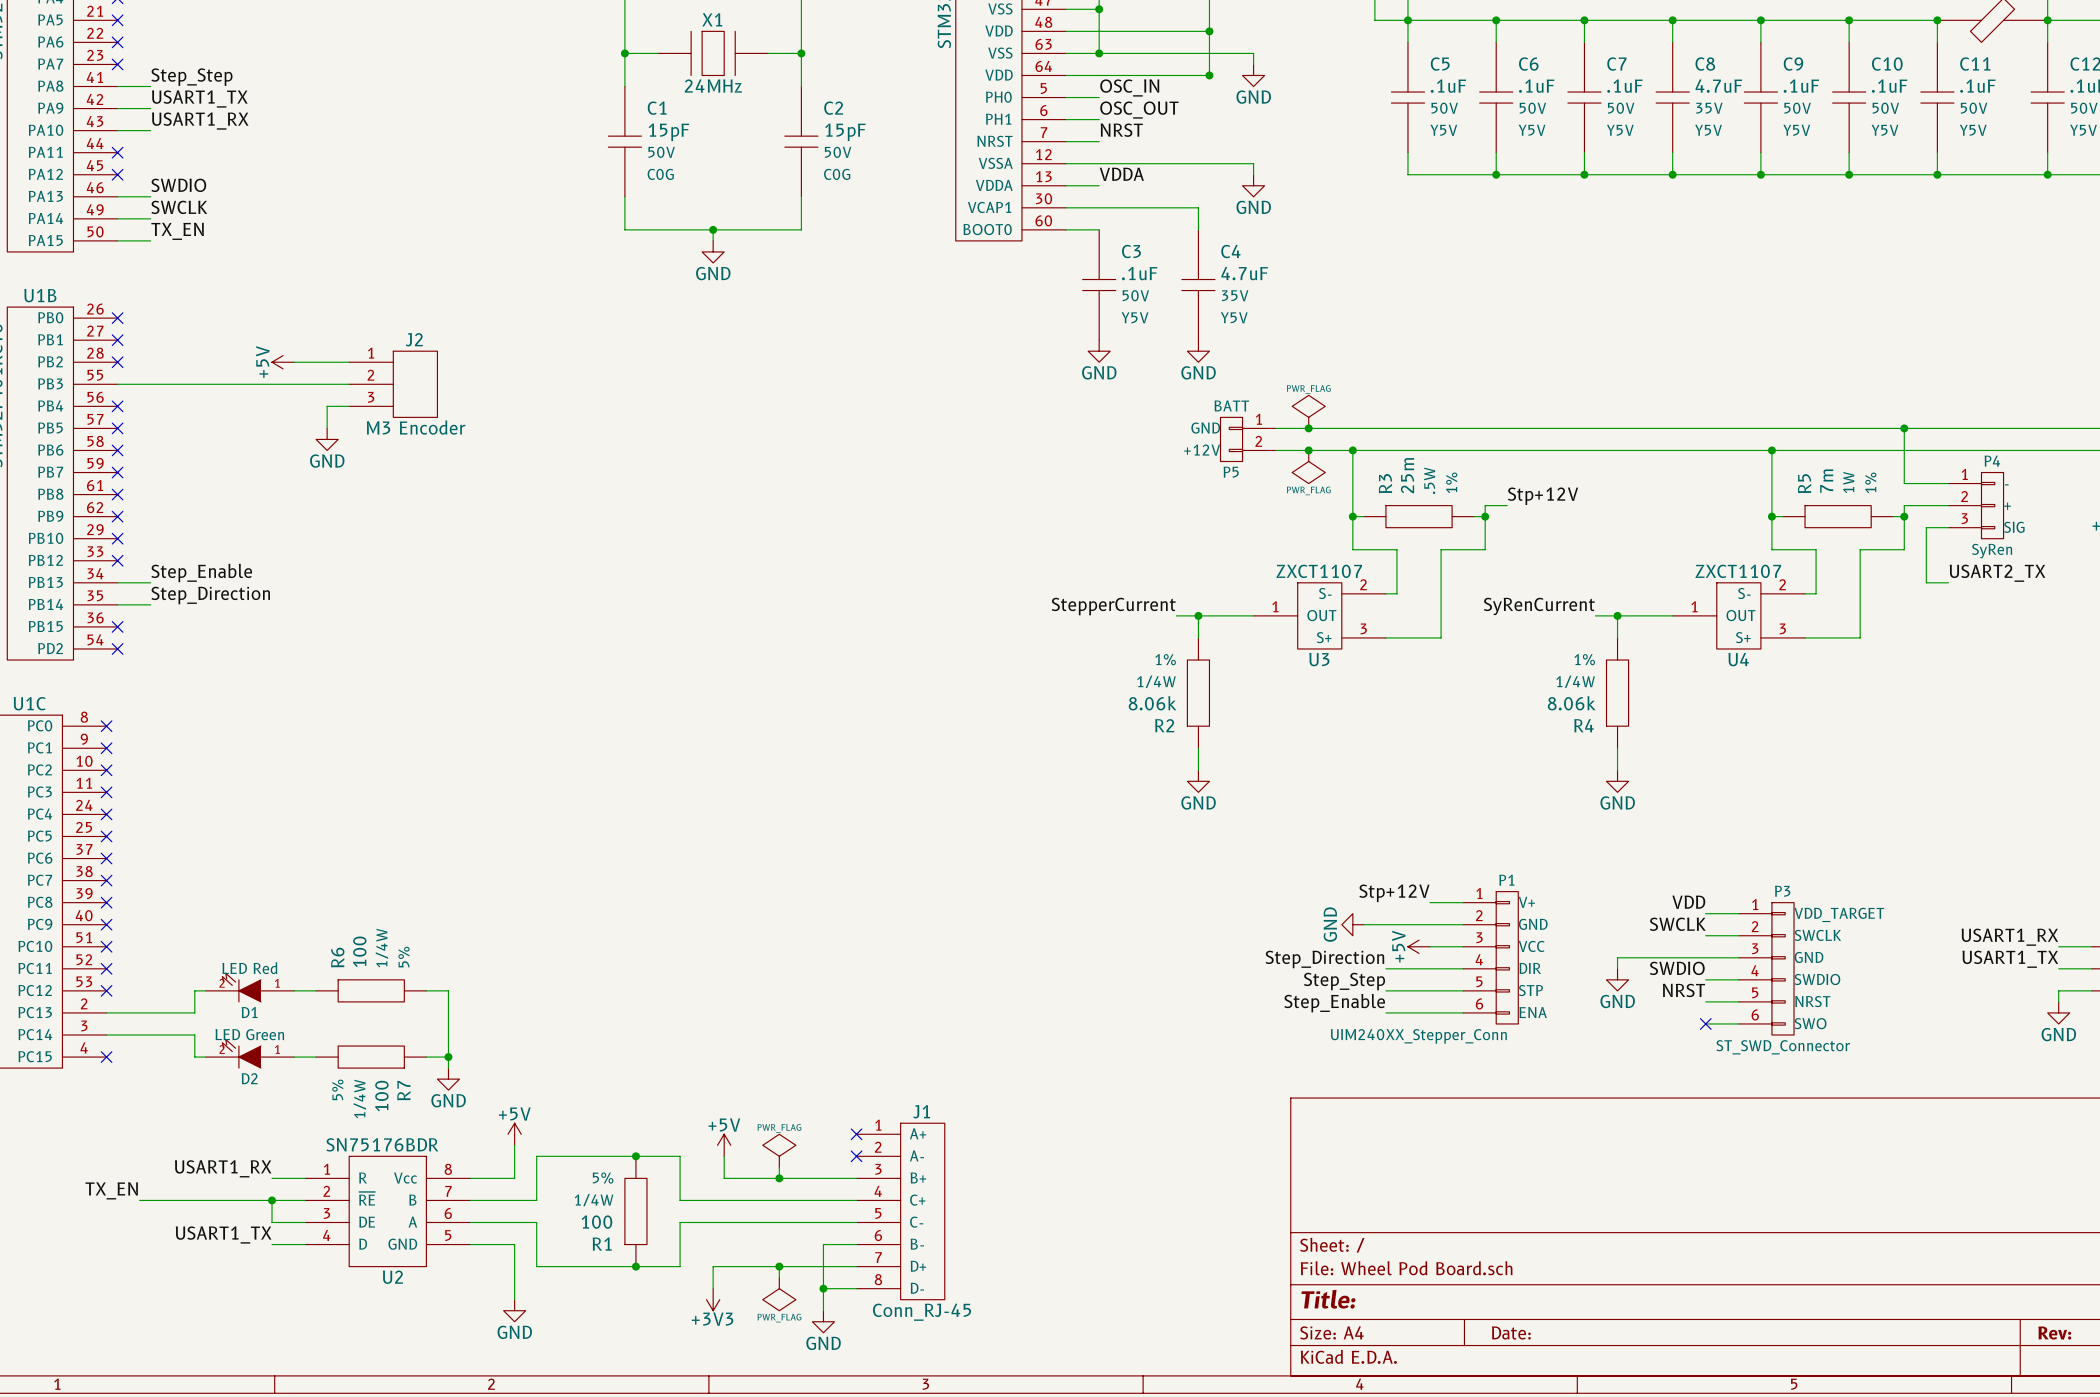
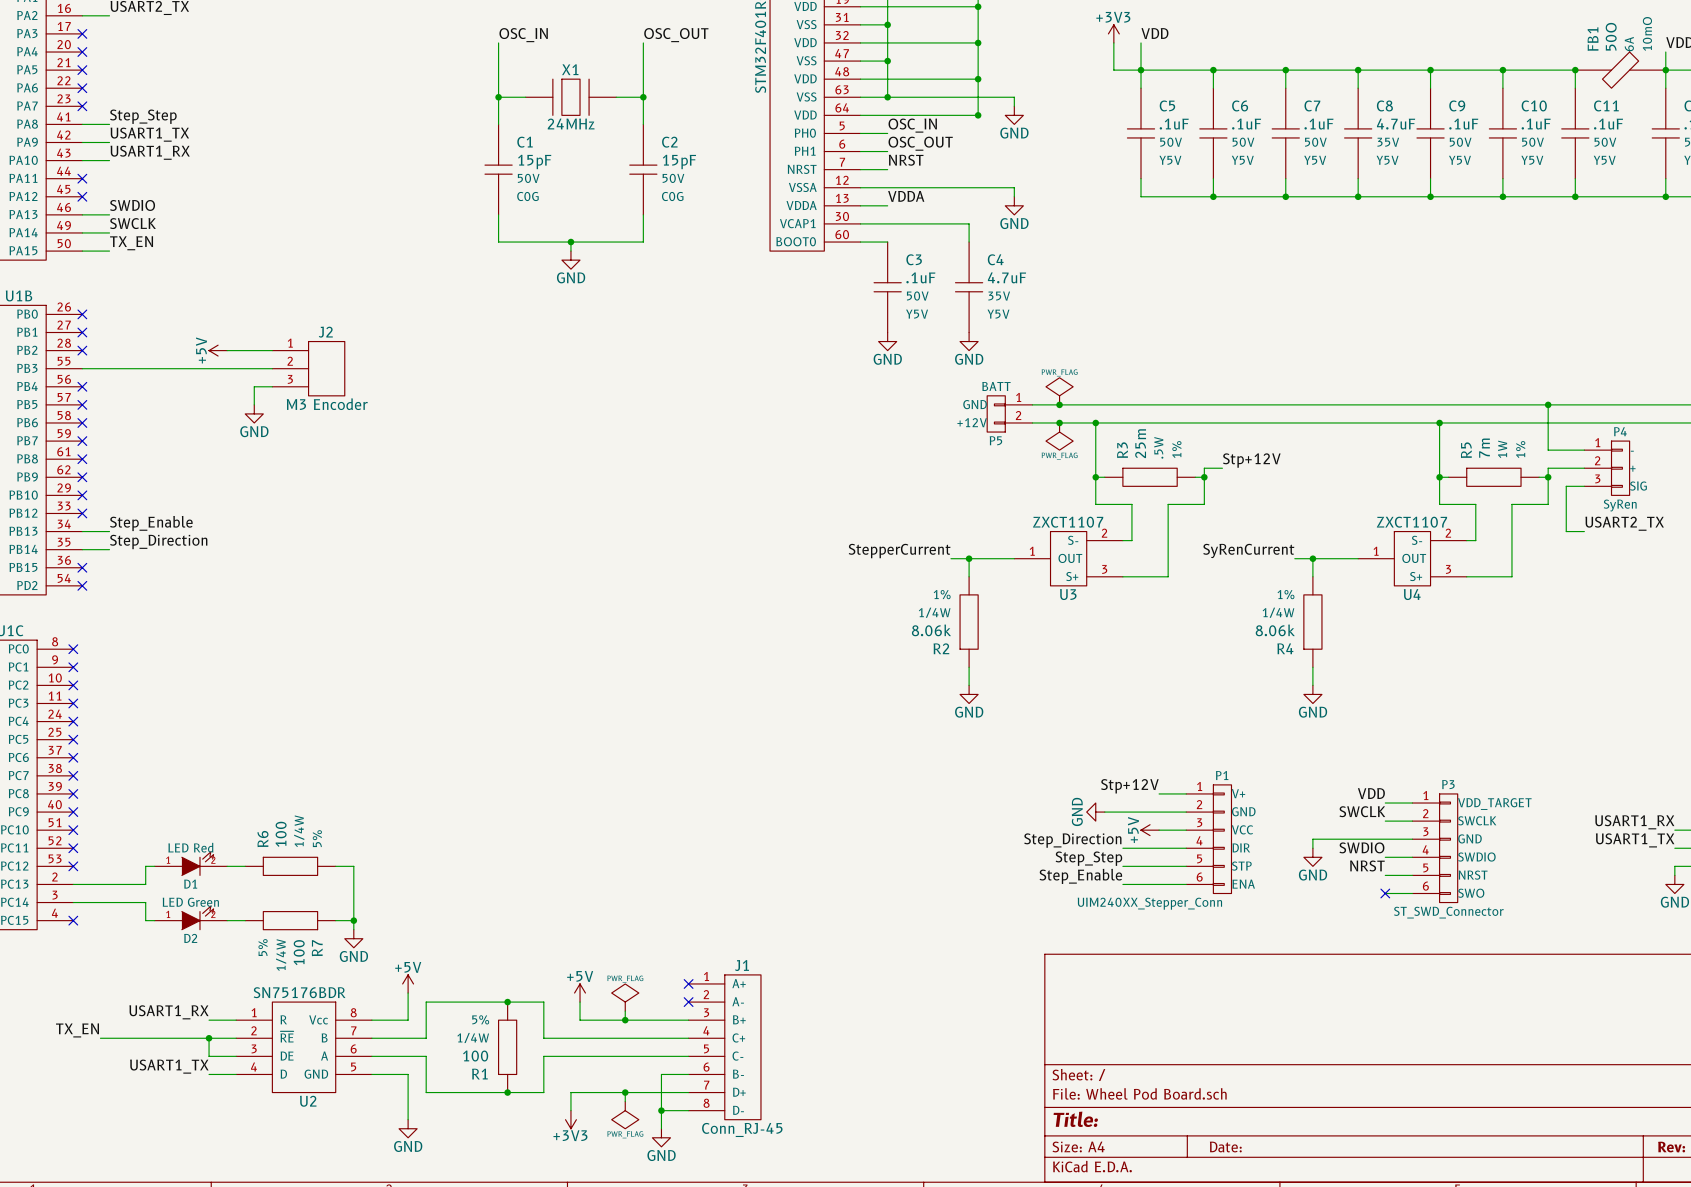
D1 flip: as is (241, 987) -> left-right (197, 863)
D2 flip: as is (241, 1053) -> left-right (197, 917)

